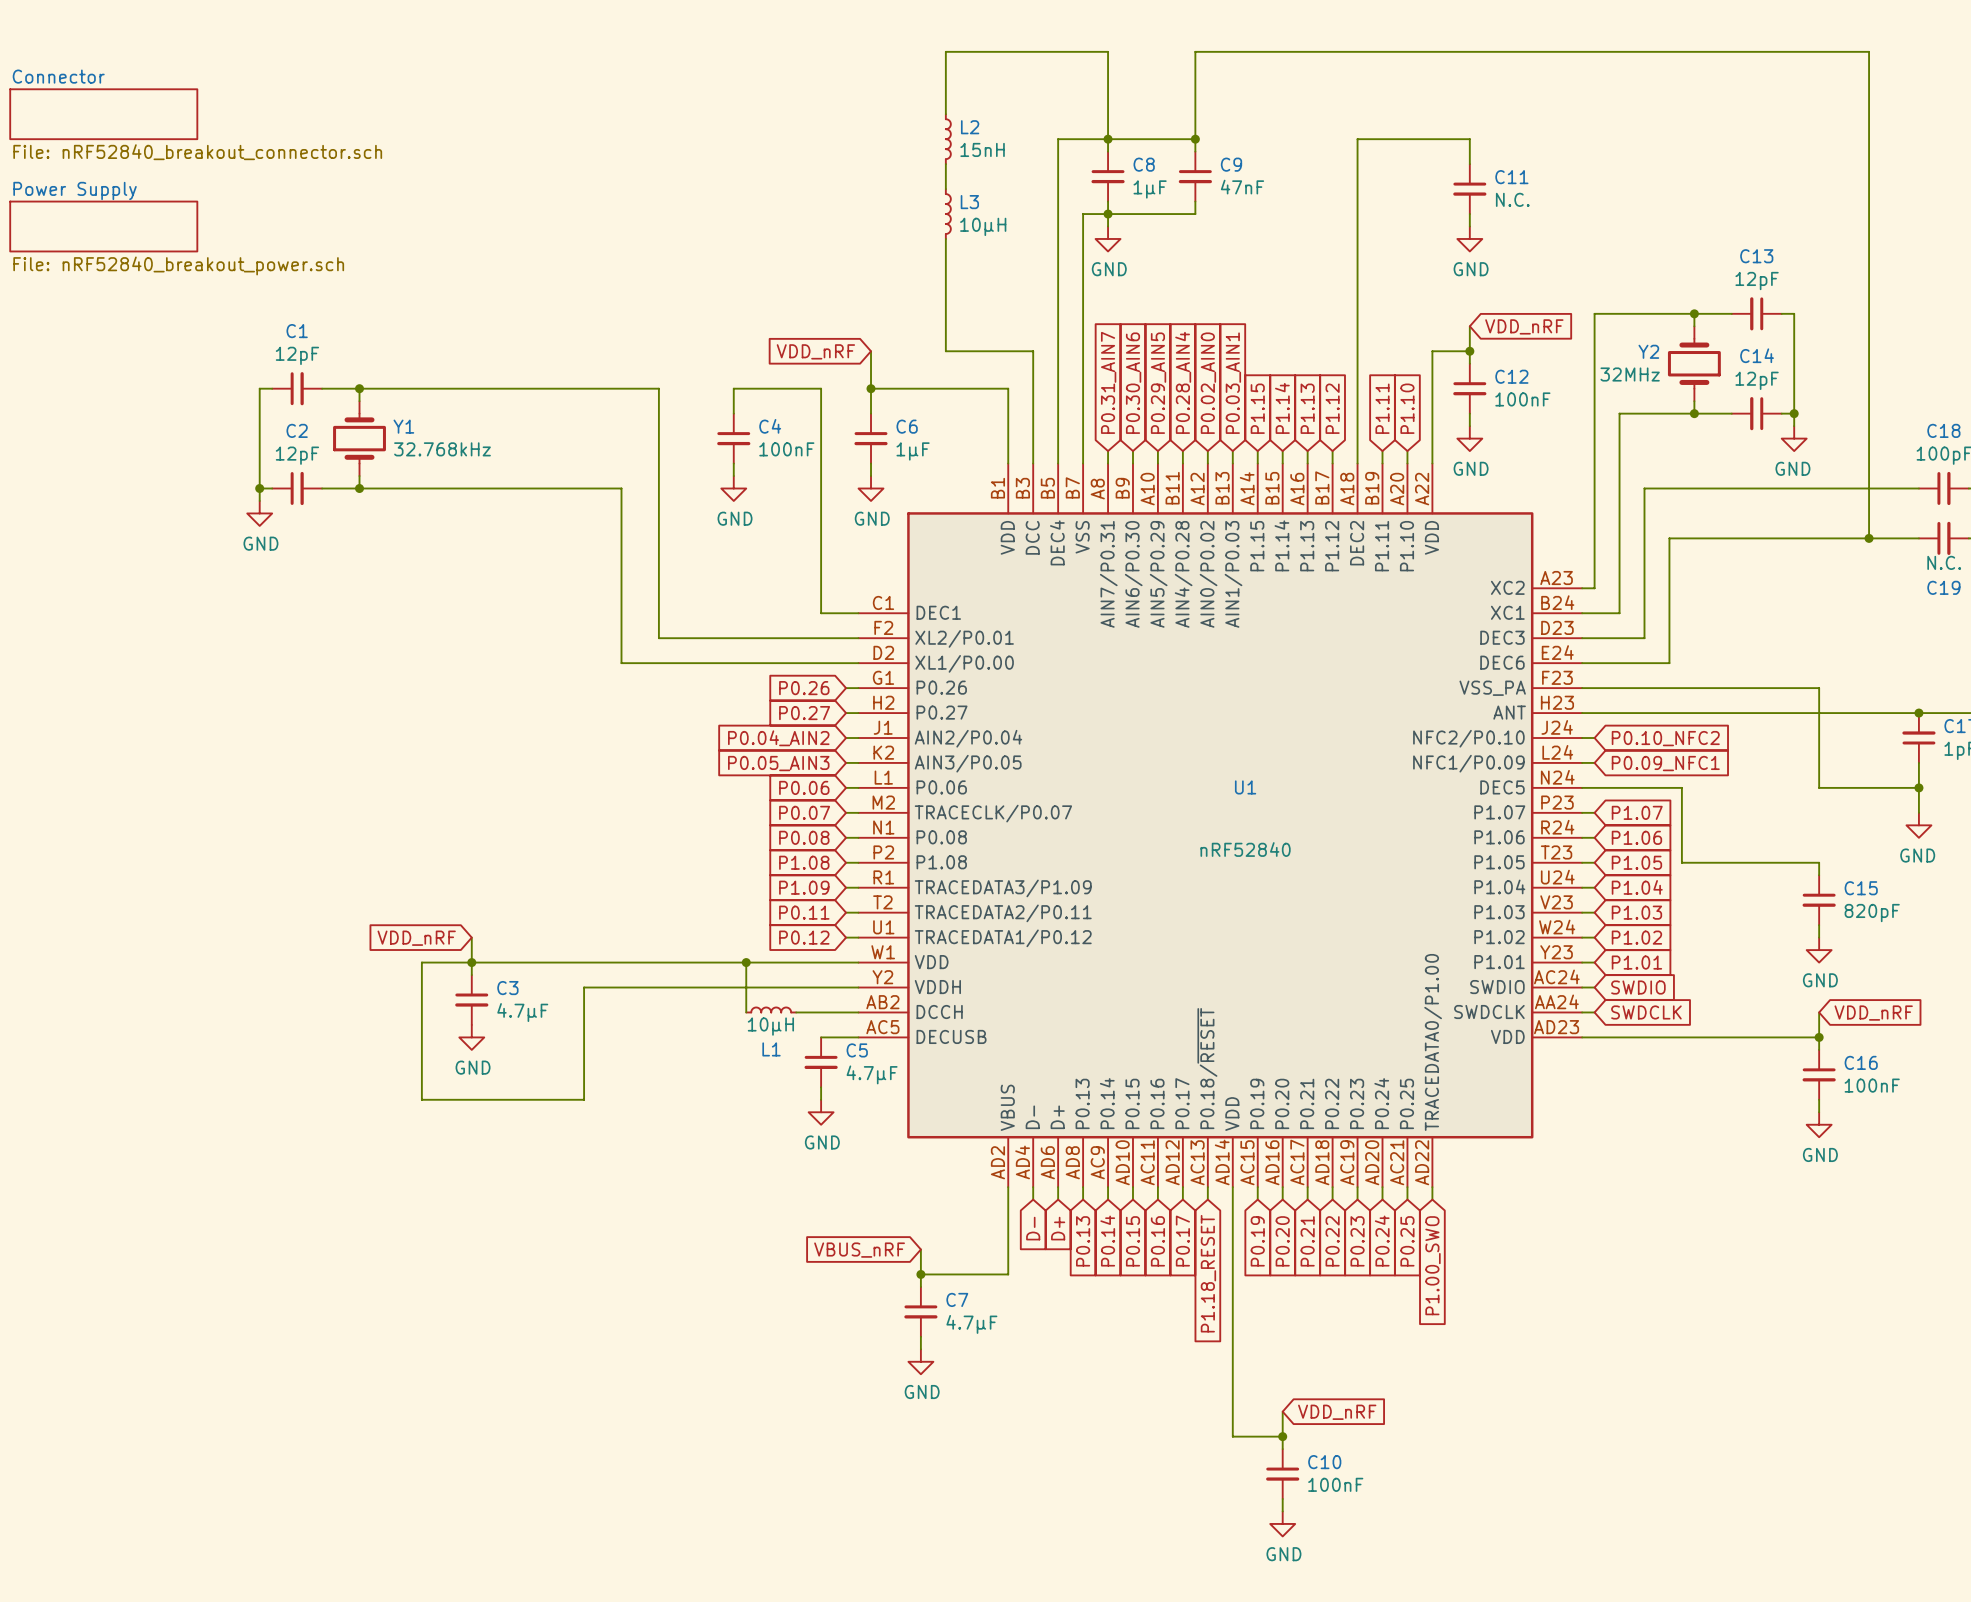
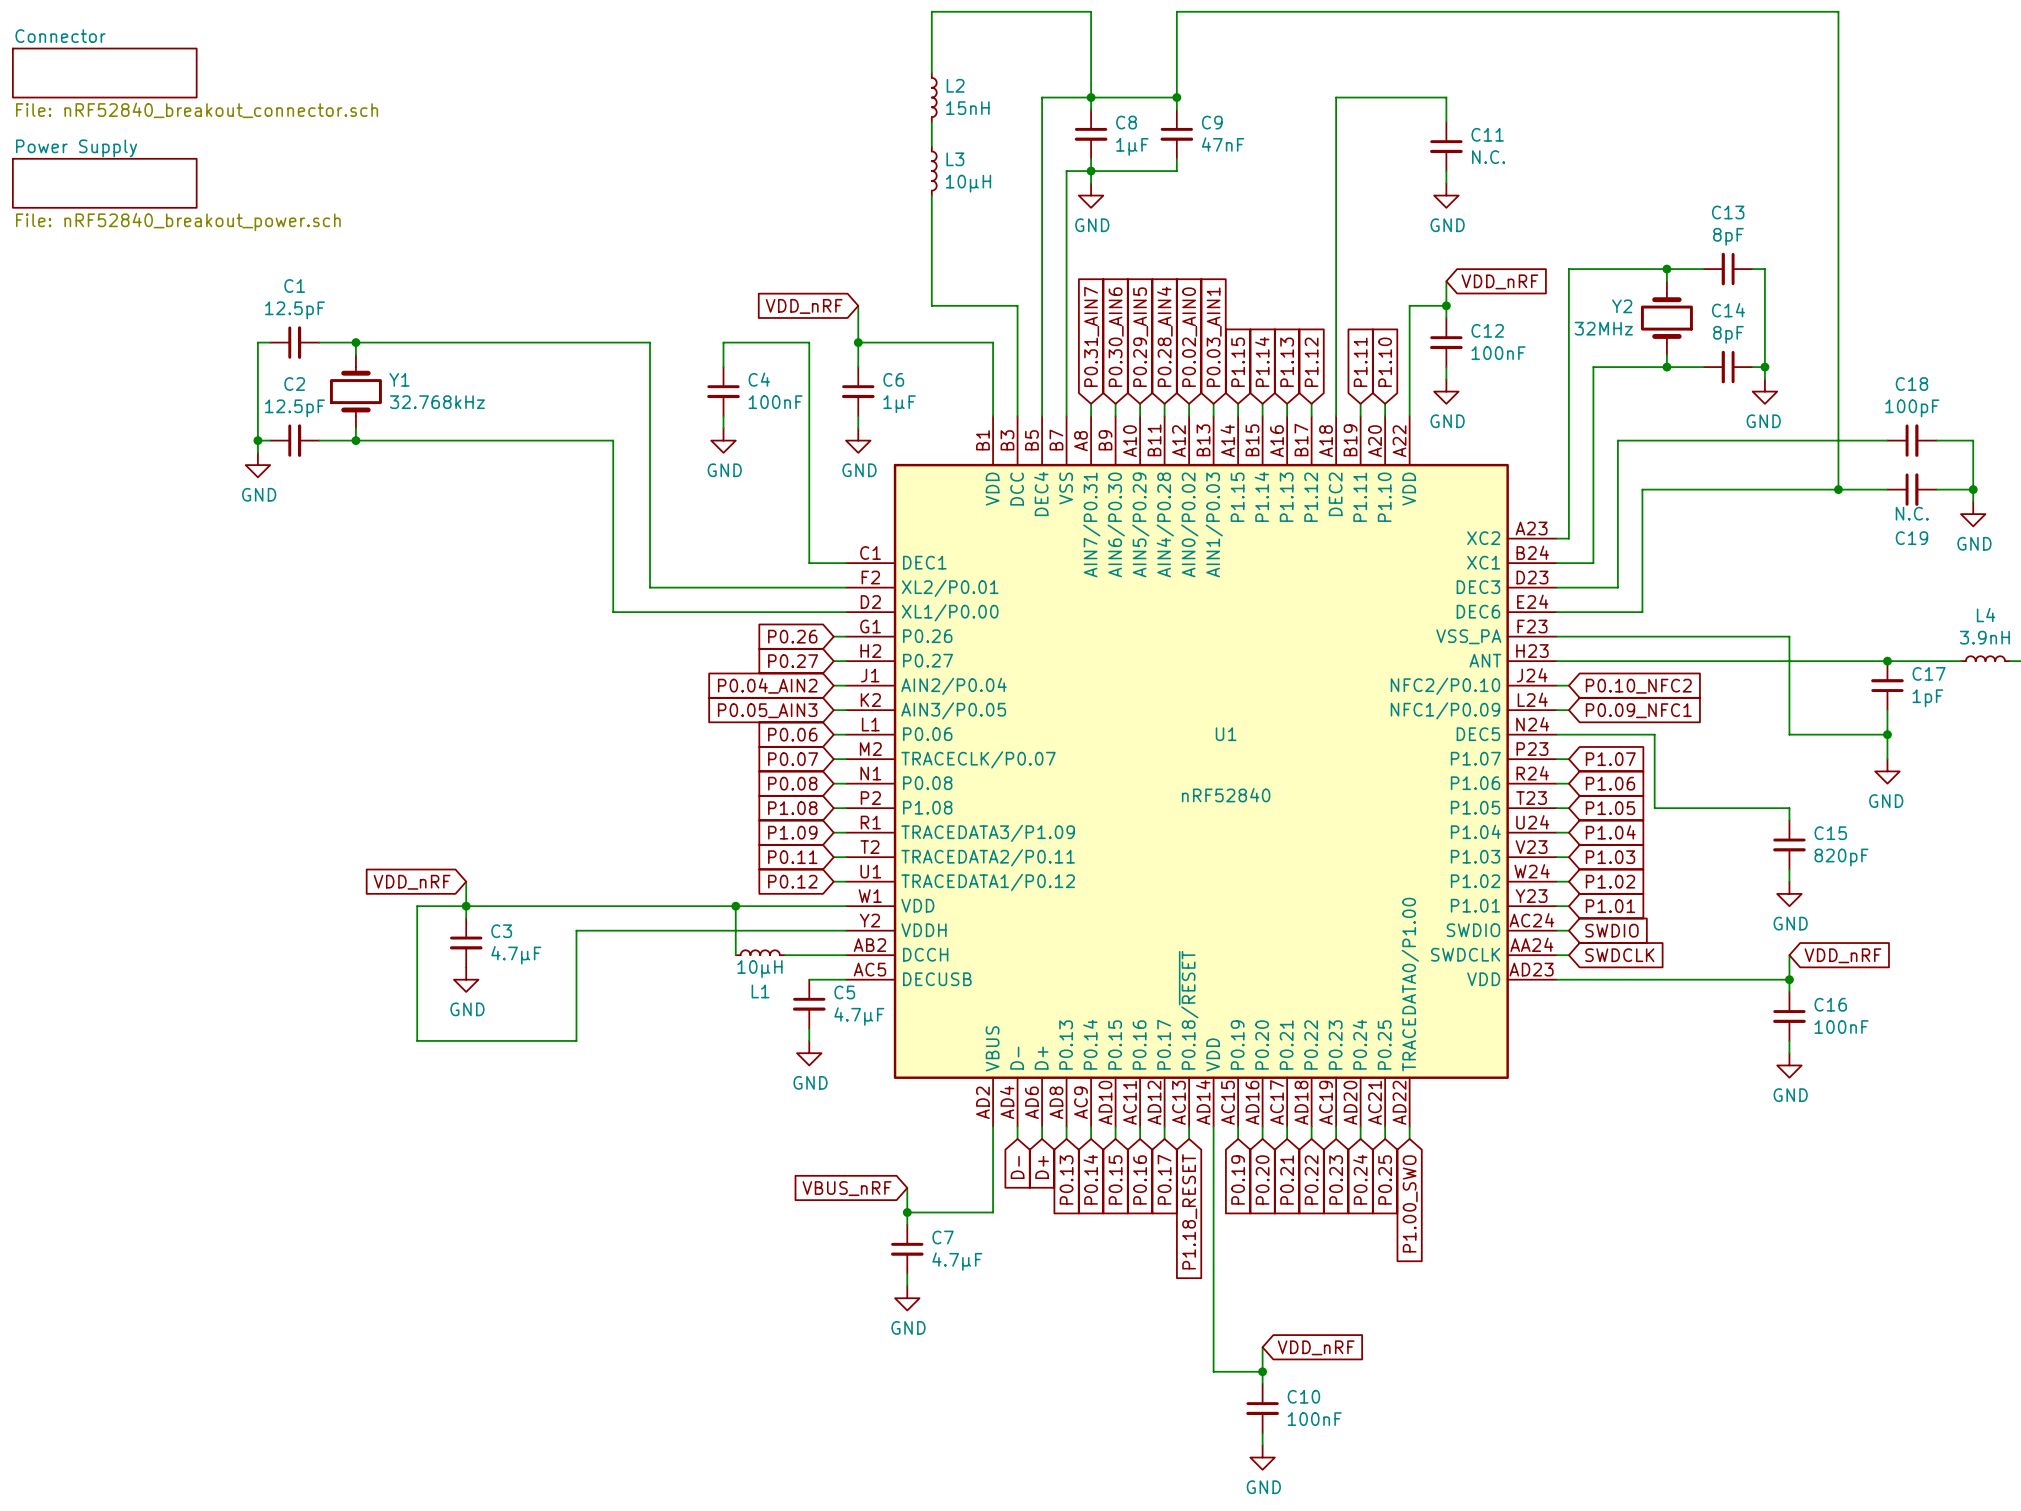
C13 value: 12pF (1757, 281) -> 8pF (1728, 236)
C1 value: 12pF (297, 355) -> 12.5pF (294, 310)
C14 value: 12pF (1757, 380) -> 8pF (1728, 334)
C2 value: 12pF (297, 455) -> 12.5pF (294, 408)

